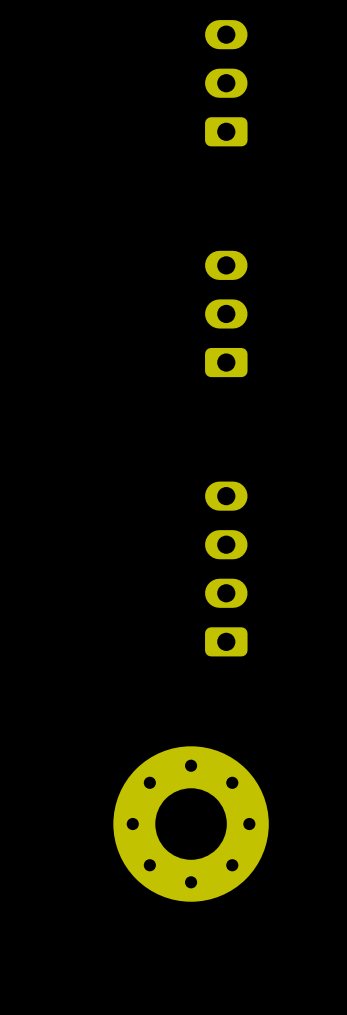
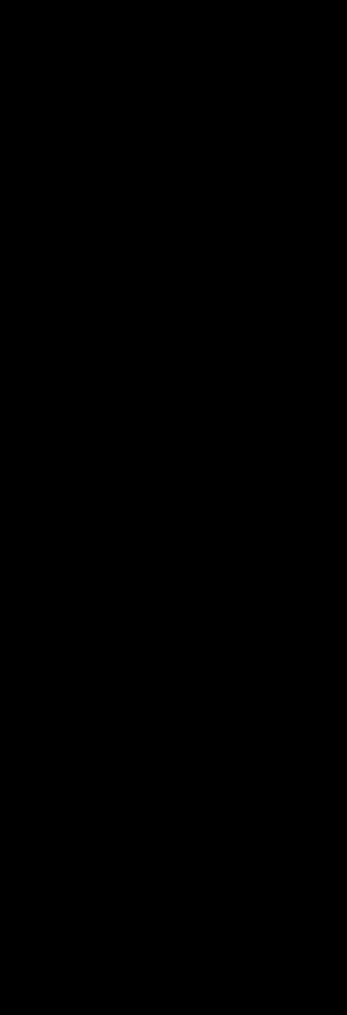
part: (226, 83) -> none
part: (226, 313) -> none
part: (226, 568) -> none
part: (191, 824) -> none

